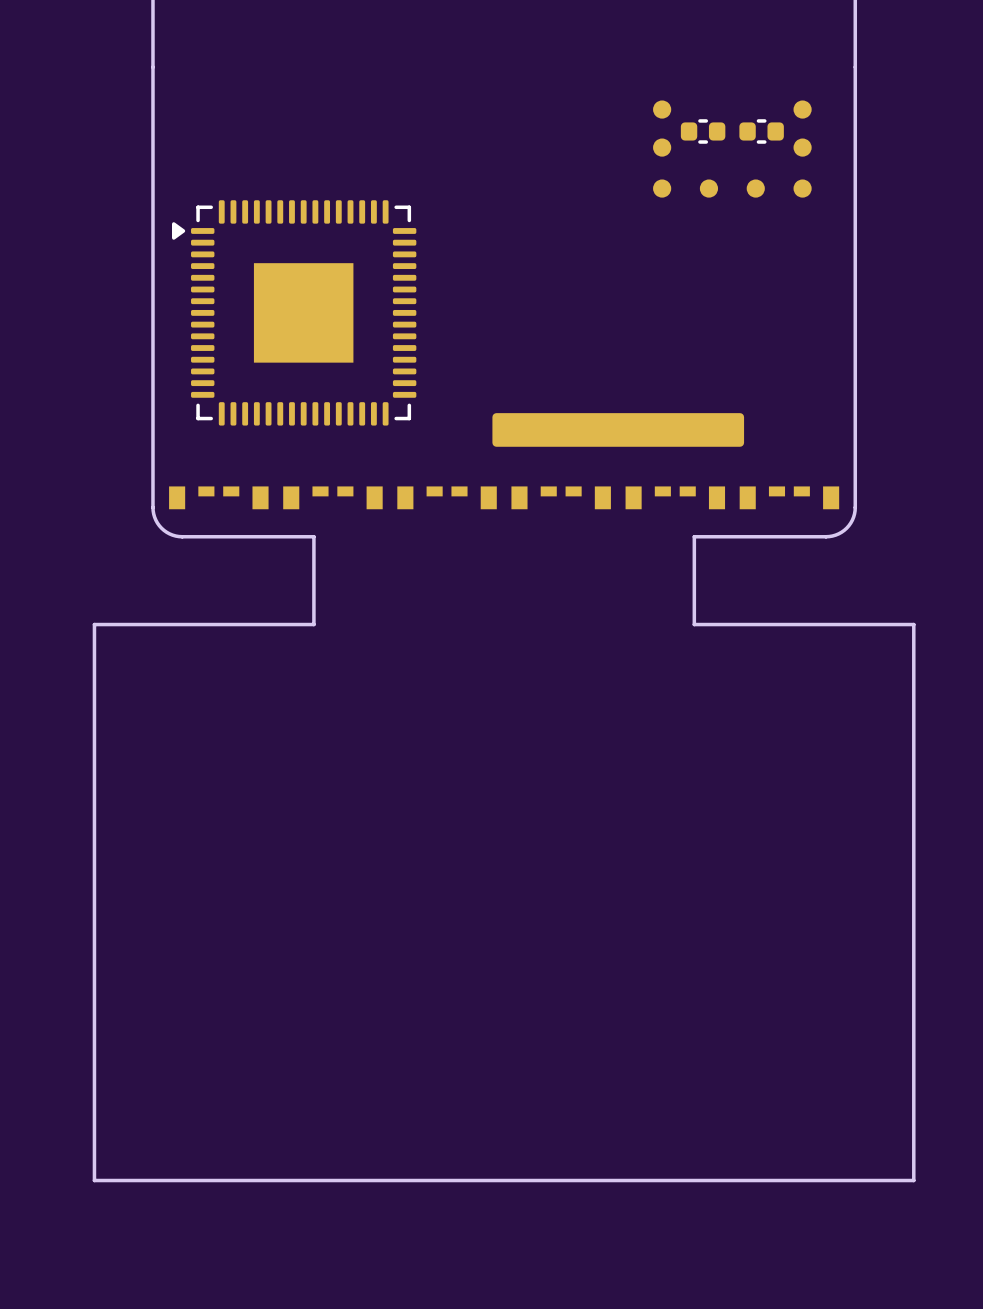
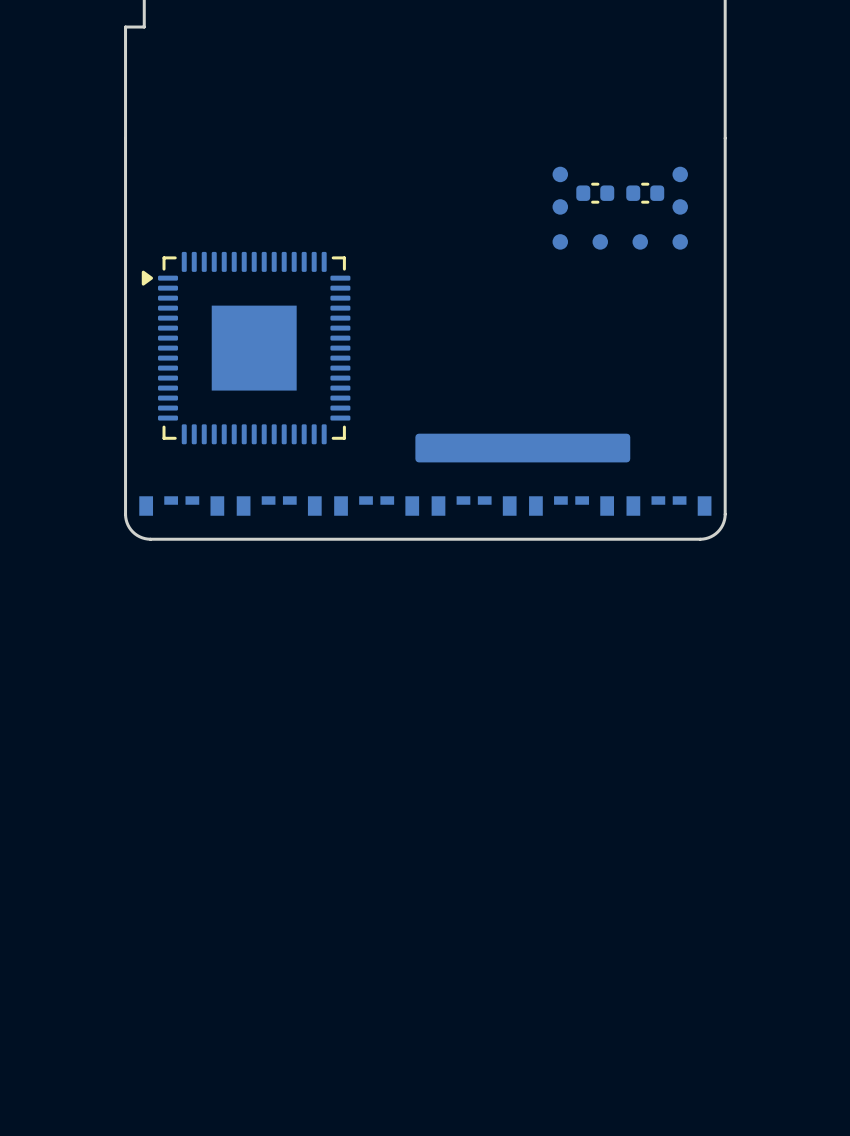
board edge: (694, 536) (694, 624) (913, 624) (913, 1180) (94, 1180) (94, 624) (313, 624) (313, 536) -> (587, 539) (262, 539)

